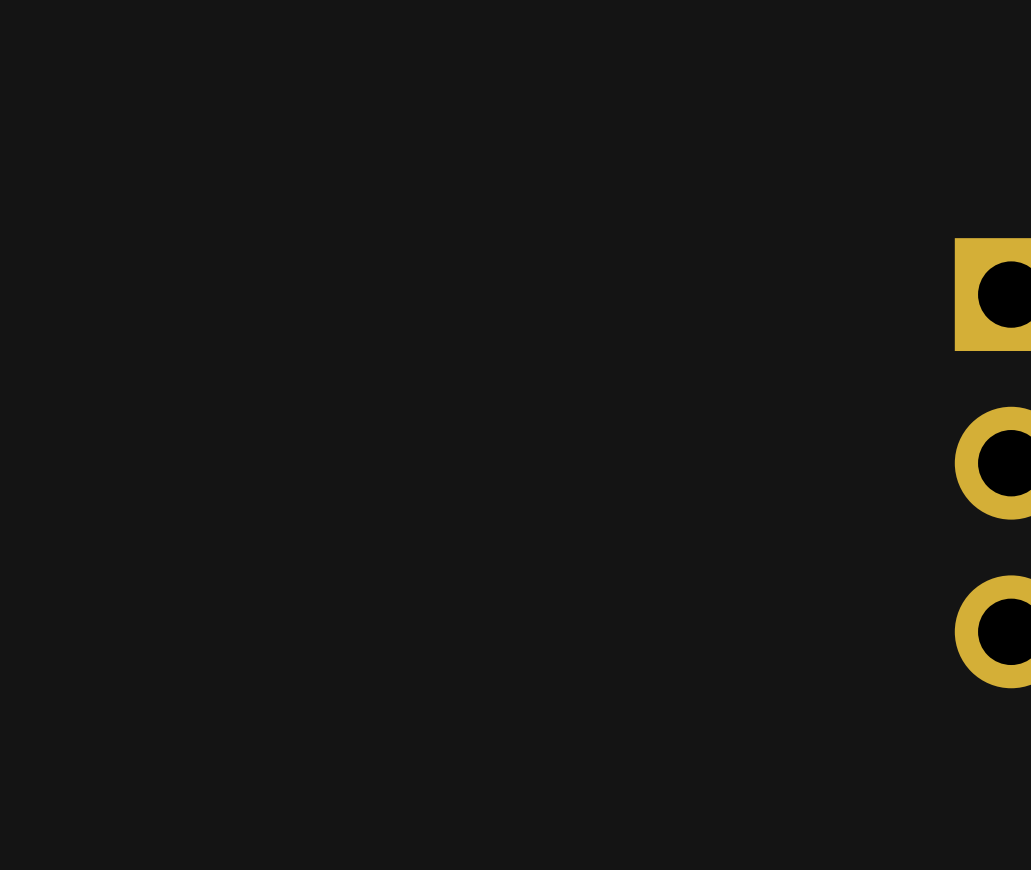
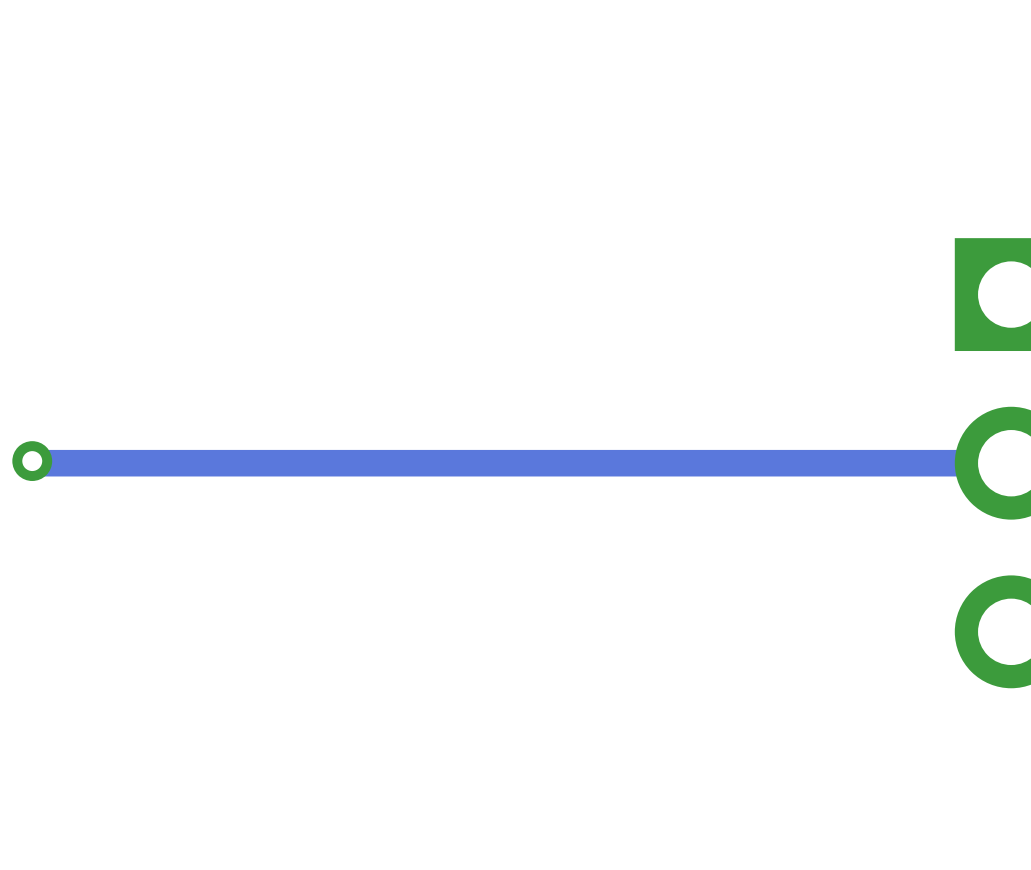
track: none -> (32, 461) (34, 463) (1011, 463)
via: none -> (32, 461)

